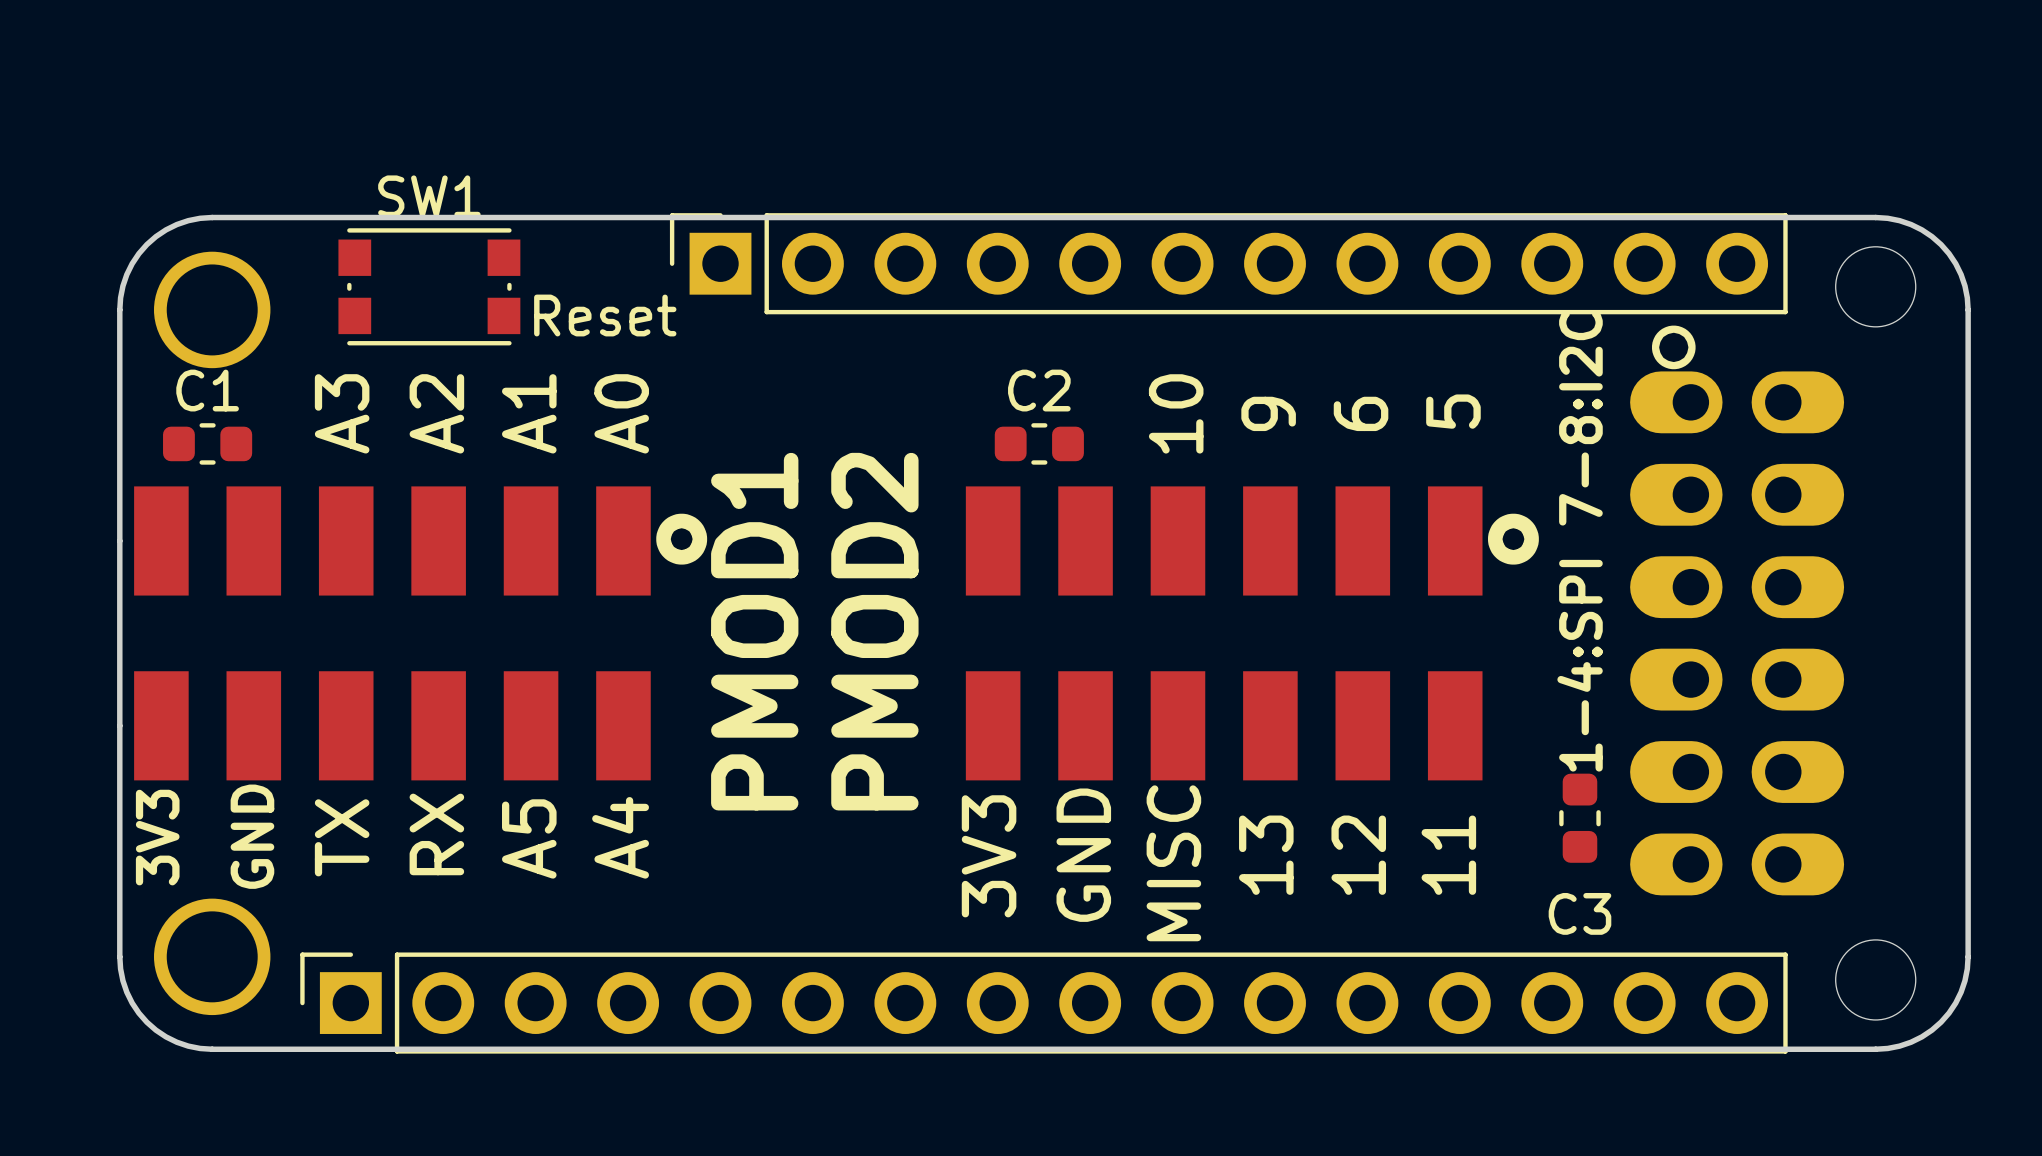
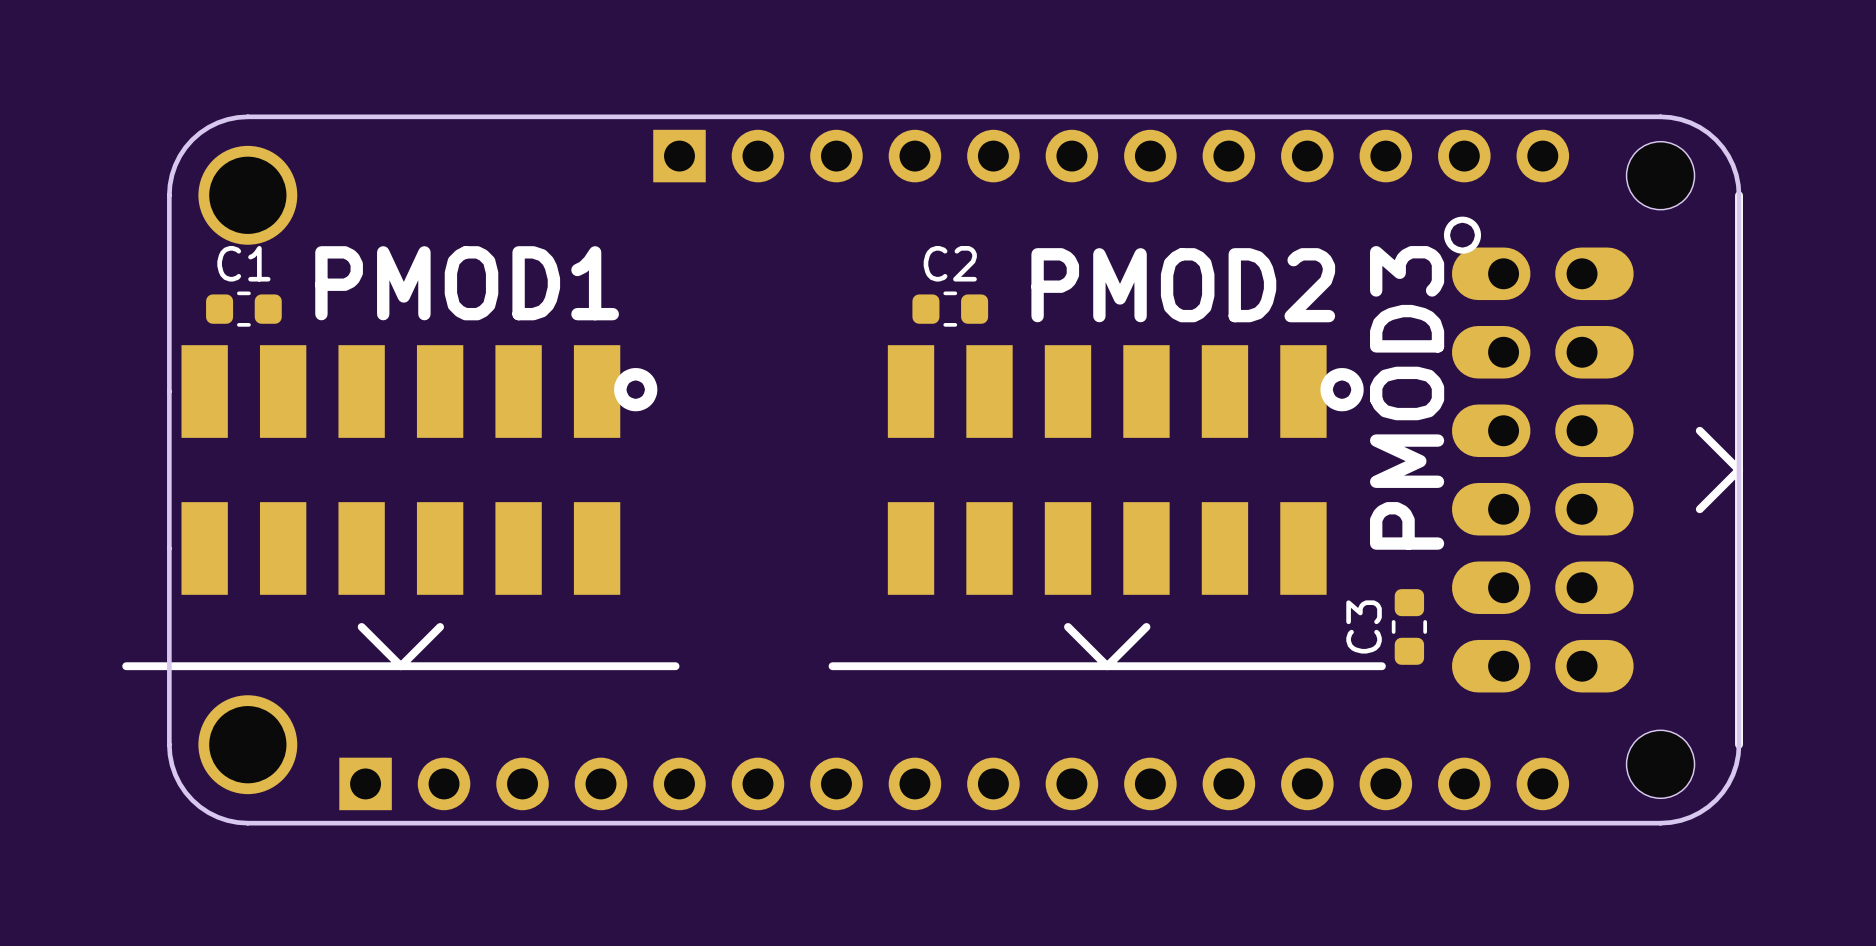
part footprint: [669, 213, 1788, 315] -> [653, 129, 1570, 183]
SW1: (429, 286) -> none
text: Reset (605, 315) -> none
text: 5 (1453, 411) -> none
text: A3 (342, 413) -> none
text: A2 (436, 413) -> none
text: A1 (529, 413) -> none
text: A0 (621, 413) -> none
text: 10 (1176, 413) -> none
text: 9 (1268, 413) -> none
text: 6 (1361, 413) -> none
PMOD1 footprint: [134, 486, 708, 781] -> [122, 345, 680, 671]
PMOD2 footprint: [965, 486, 1539, 781] -> [828, 345, 1386, 671]
text: 1-4:SPI 7-8:I2C (1580, 540) -> none
part: (1737, 610) -> none
PMOD1 name position: PMOD1 (754, 631) -> PMOD1 (467, 283)
PMOD2 name position: PMOD2 (874, 631) -> PMOD2 (1183, 285)
PMOD3: none -> (1593, 470)
text: RX (436, 834) -> none
text: GND (252, 836) -> none
text: 3V3 (157, 837) -> none
text: TX (342, 837) -> none
text: A4 (620, 837) -> none
text: A5 (529, 838) -> none
text: GND (1083, 855) -> none
text: 13 (1266, 855) -> none
text: 12 (1358, 855) -> none
text: 11 (1448, 855) -> none
text: 3V3 (989, 856) -> none
text: MISC (1173, 863) -> none
C3 name rotation: 0° (1579, 913) -> 90° counterclockwise (1364, 626)
C3 name position: C3 (1579, 913) -> C3 (1364, 626)
part footprint: [300, 952, 1788, 1054] -> [339, 757, 1570, 811]

